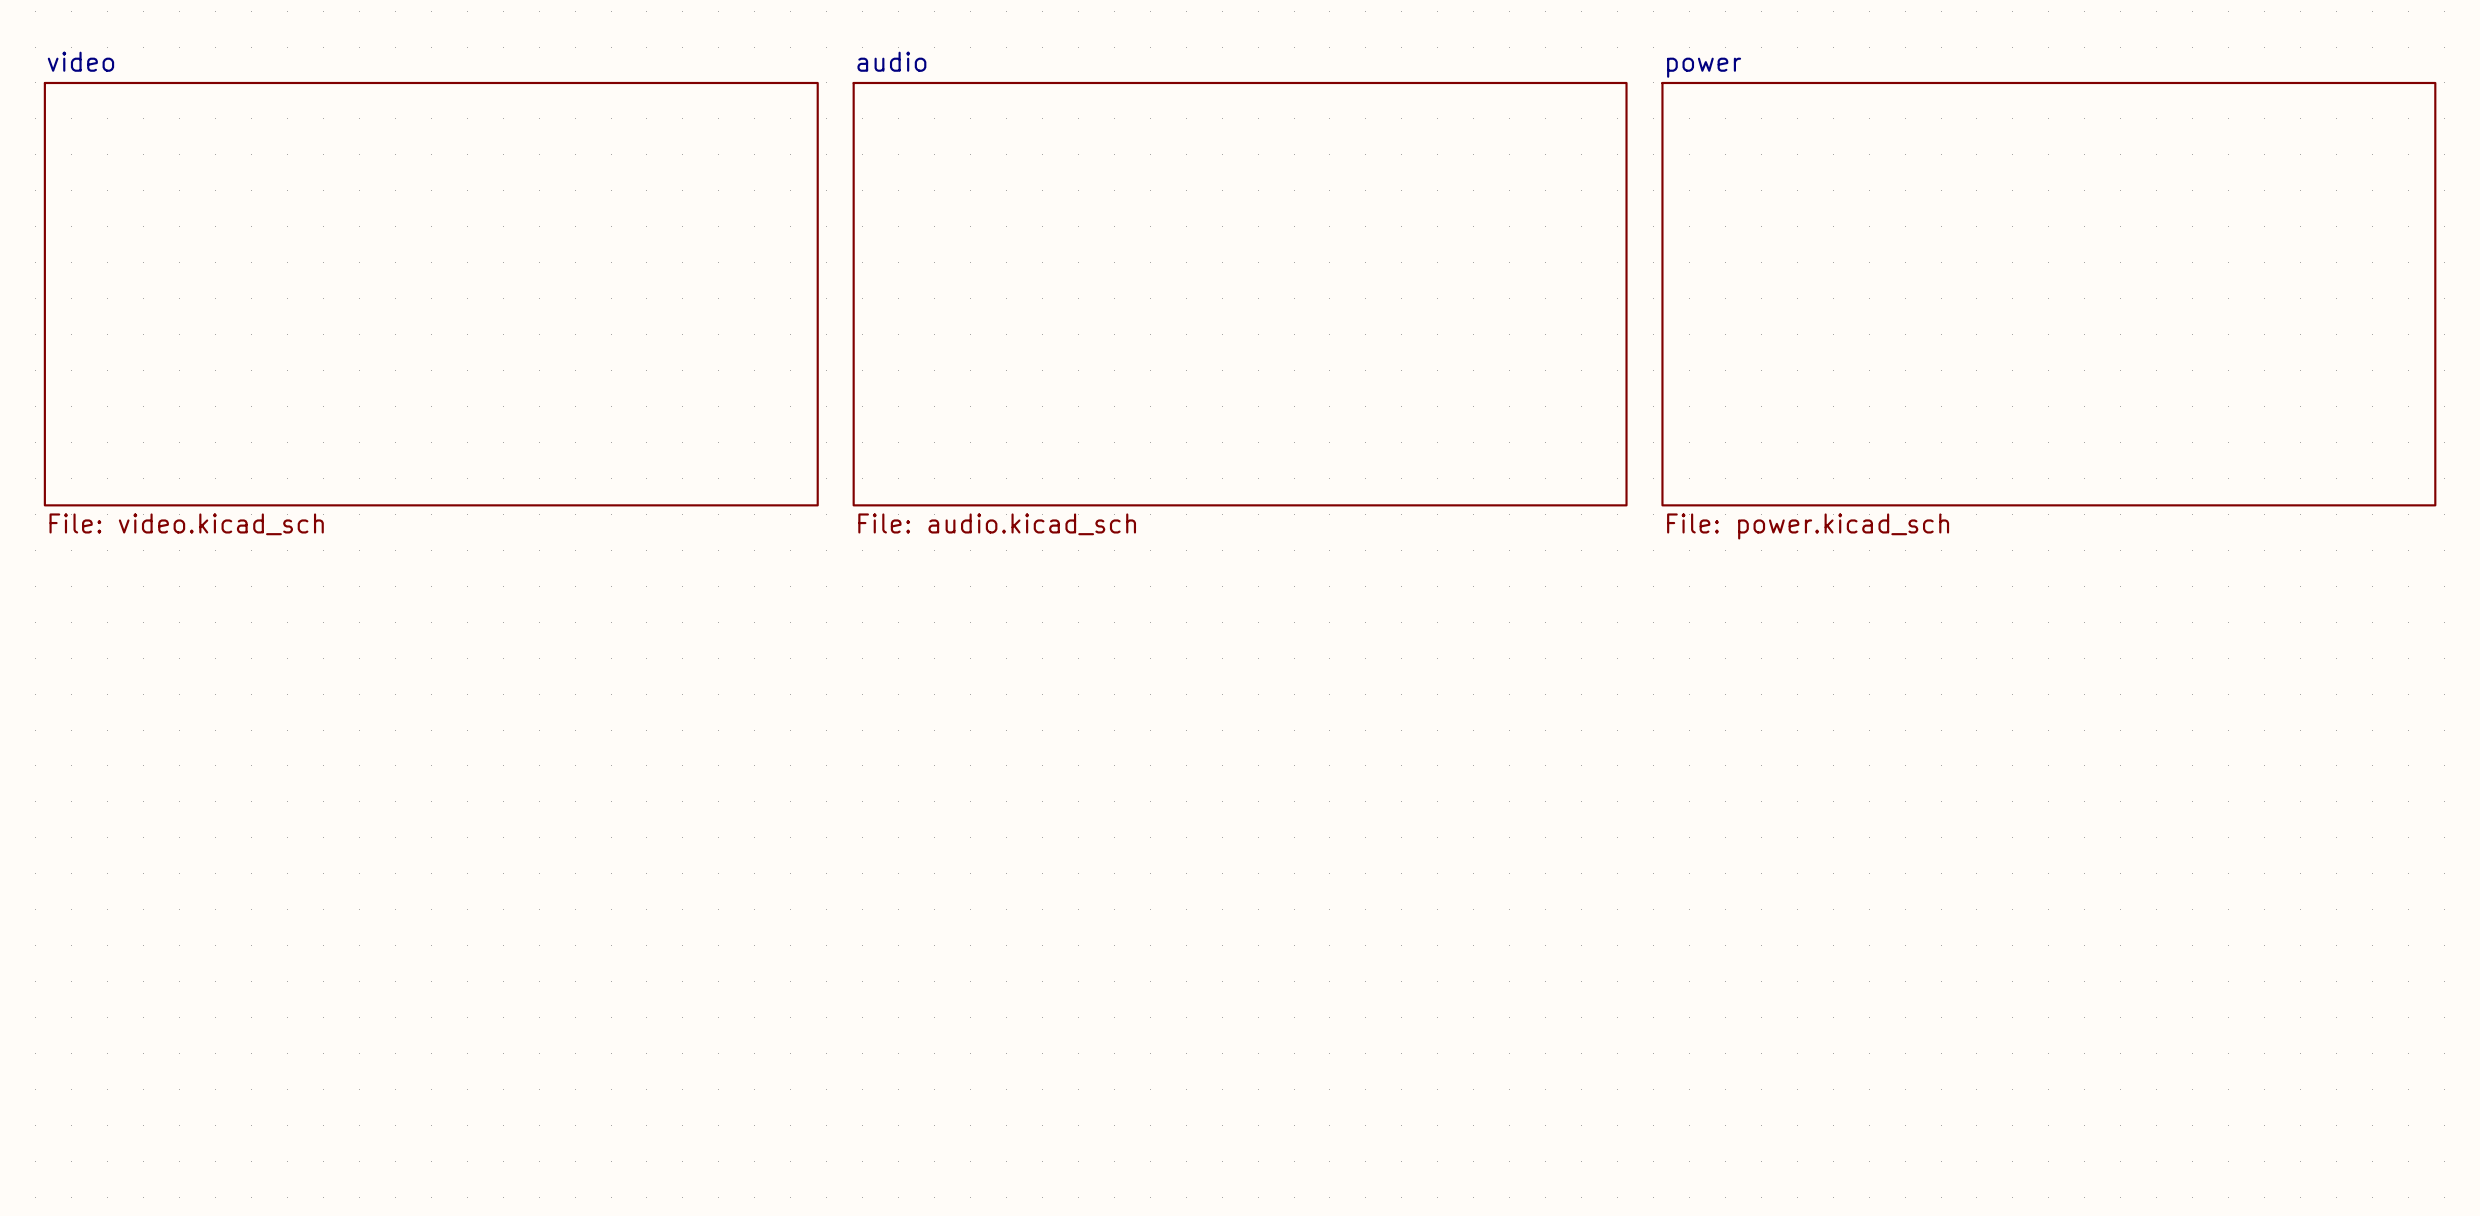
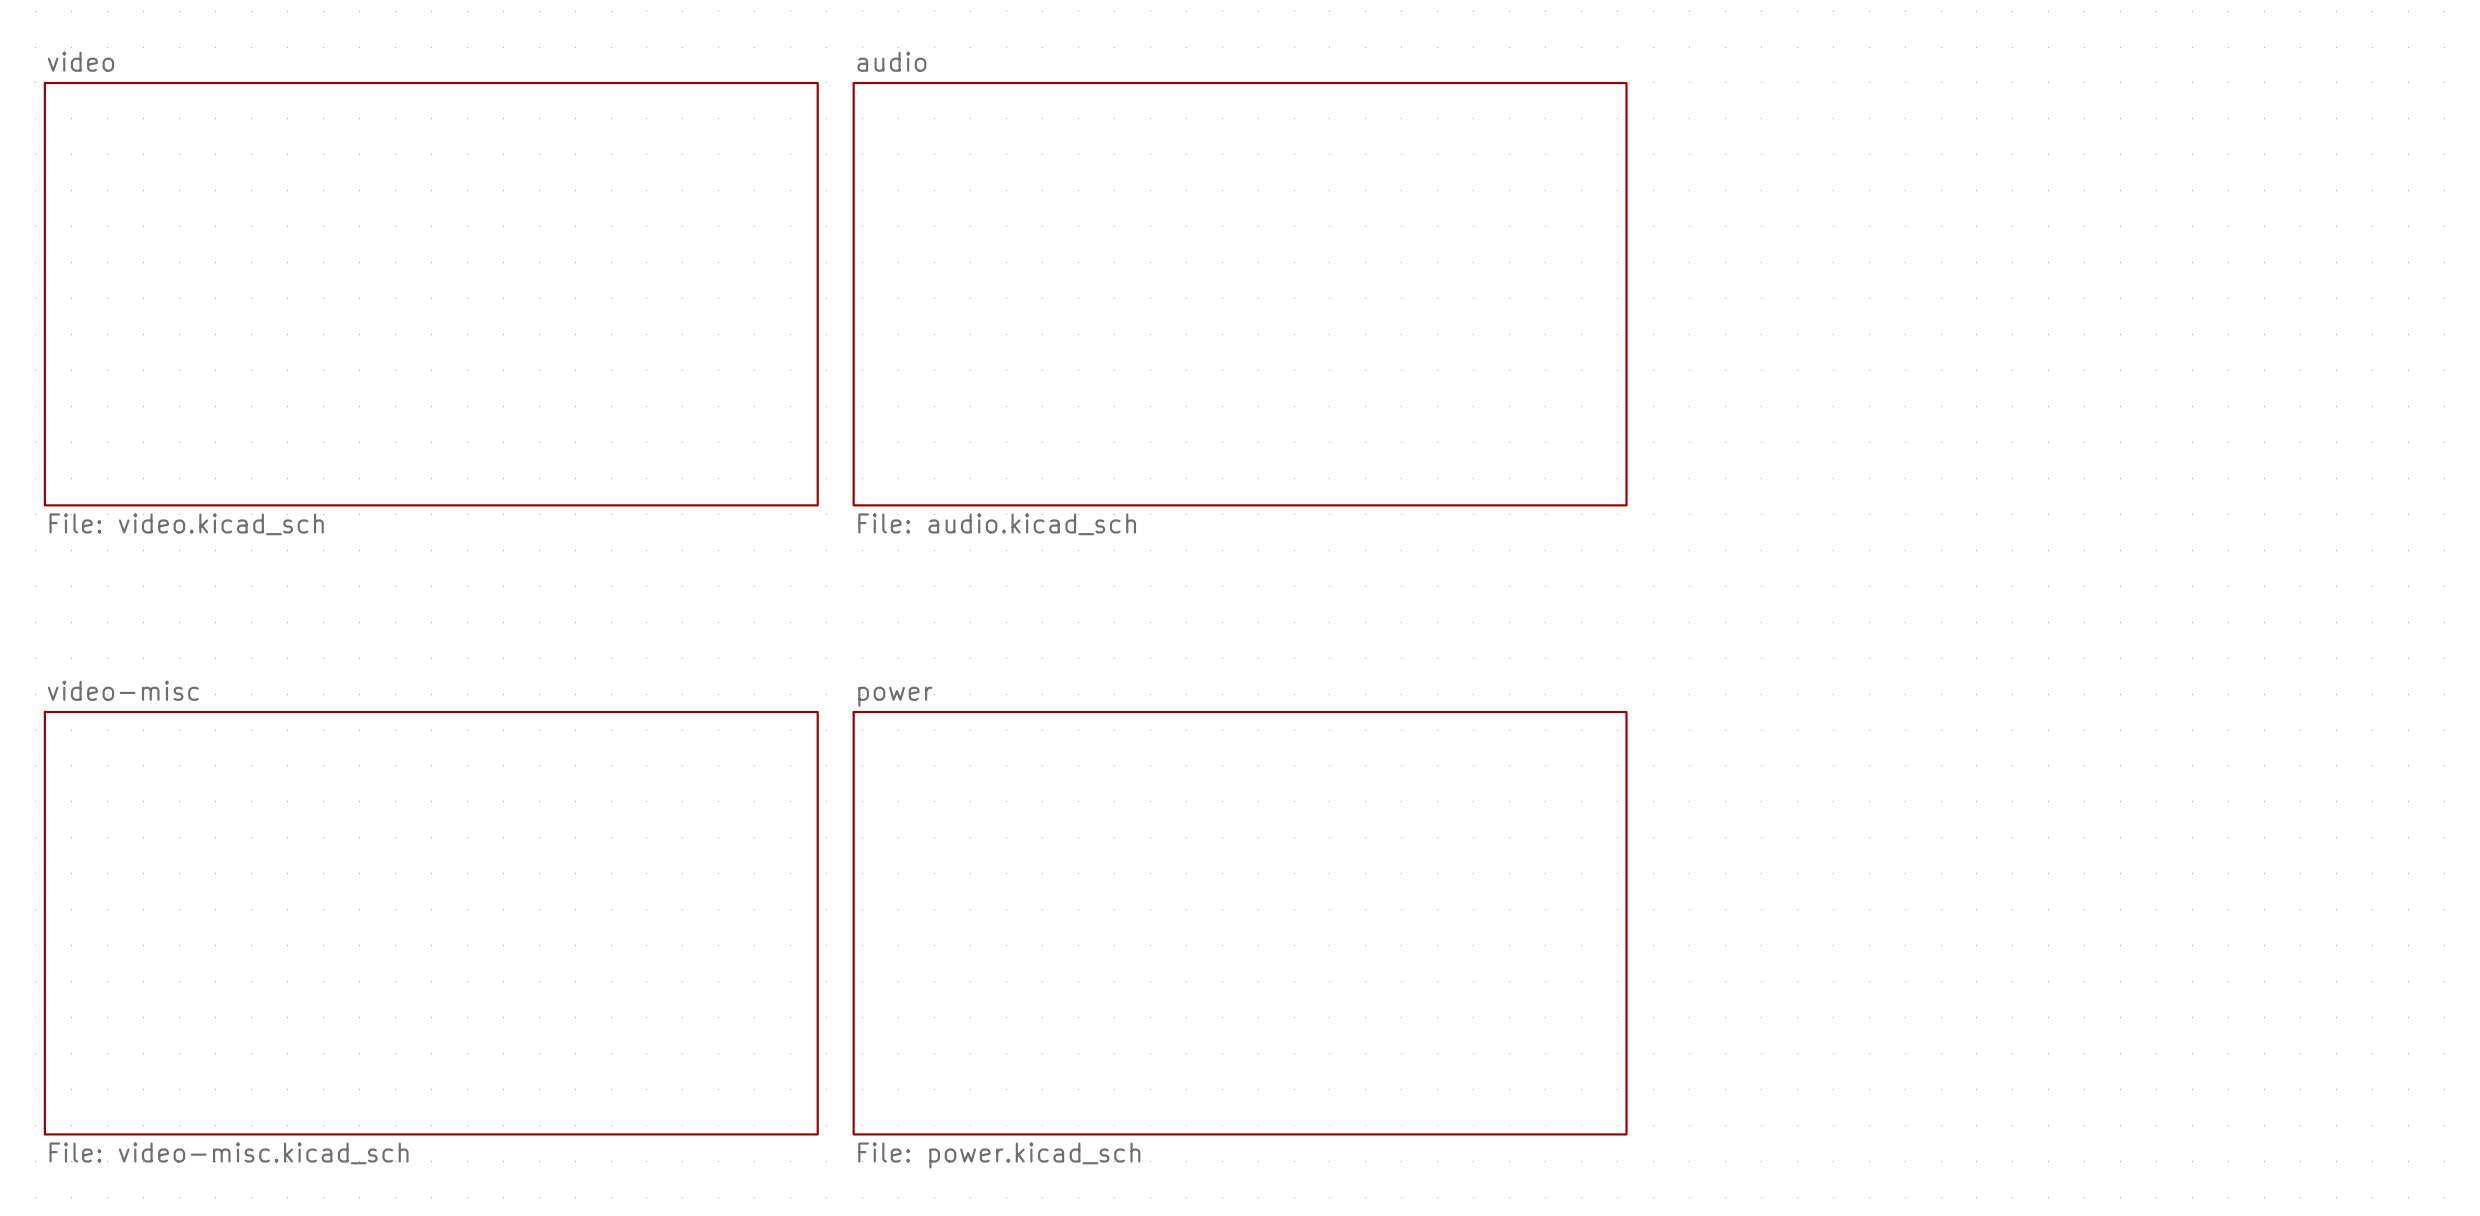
sheet power: File: power.kicad_sch (2048, 294) -> none
sheet video-misc: none -> File: video-misc.kicad_sch (431, 923)
sheet power: none -> File: power.kicad_sch (1240, 923)

